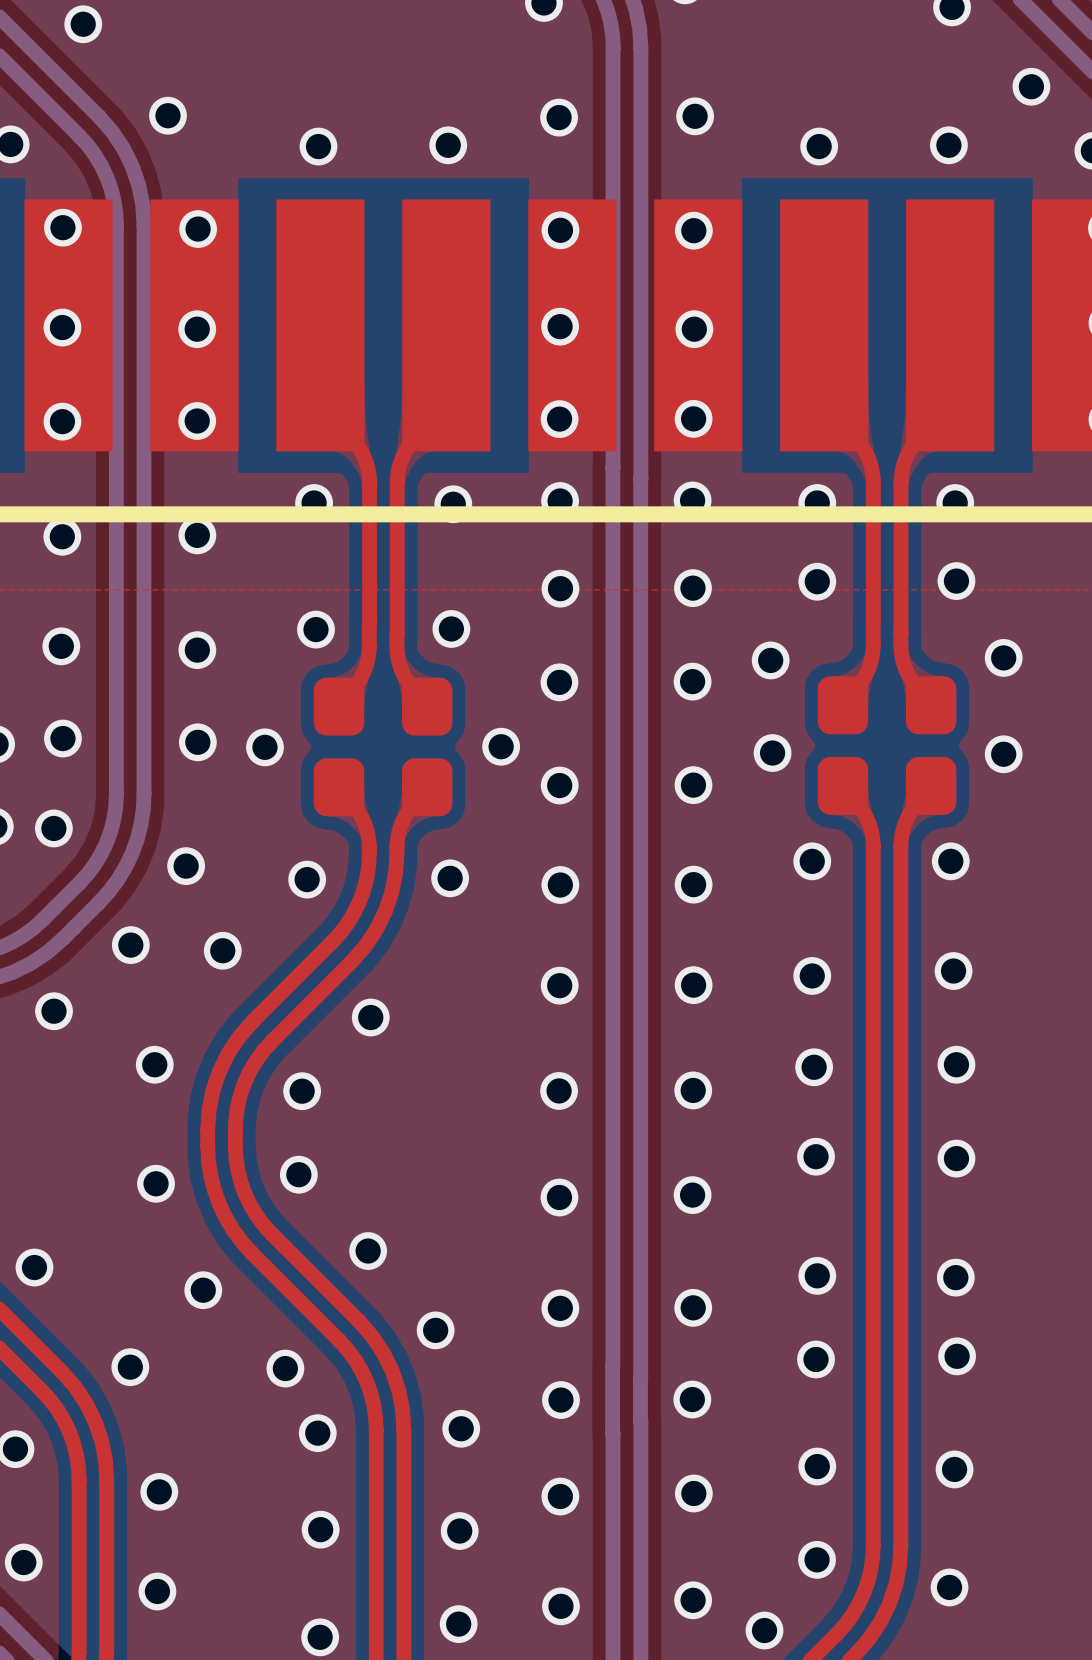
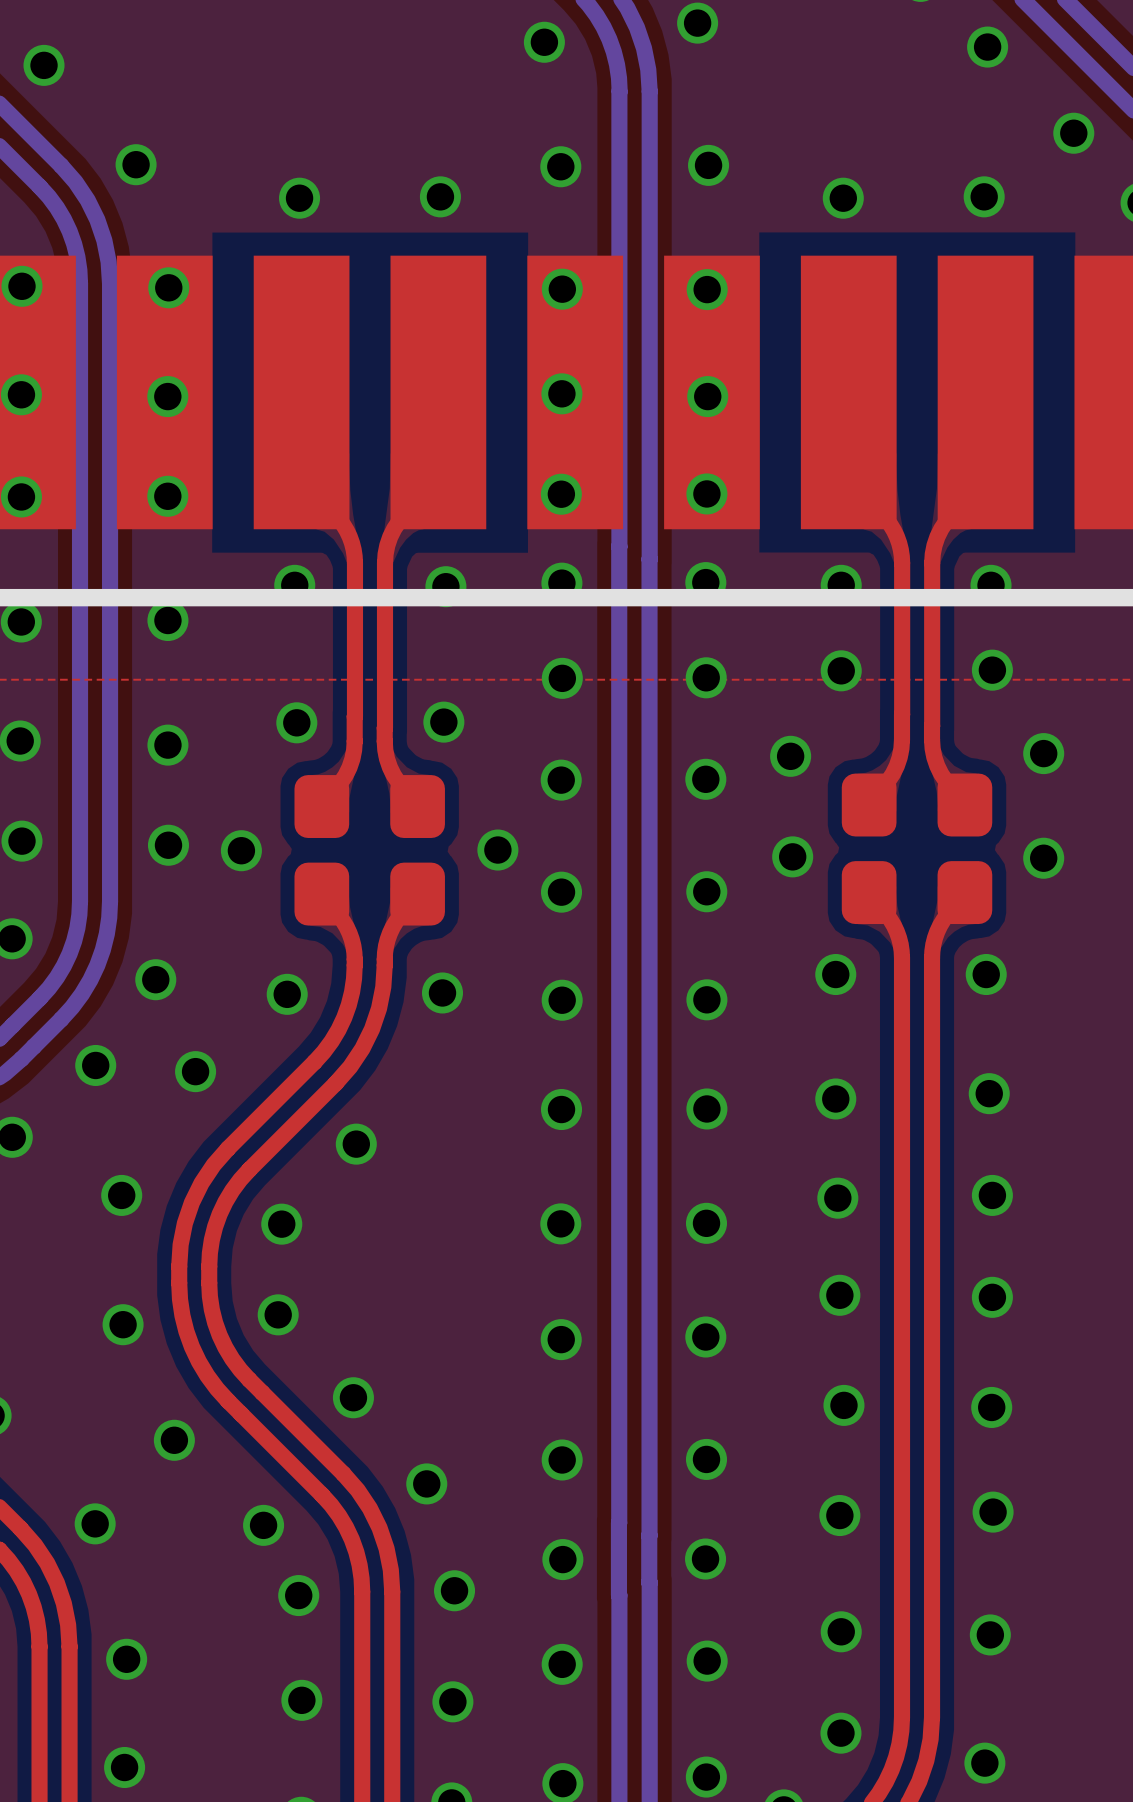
via position: (817, 1275) -> (843, 1405)
via position: (955, 1277) -> (991, 1407)

